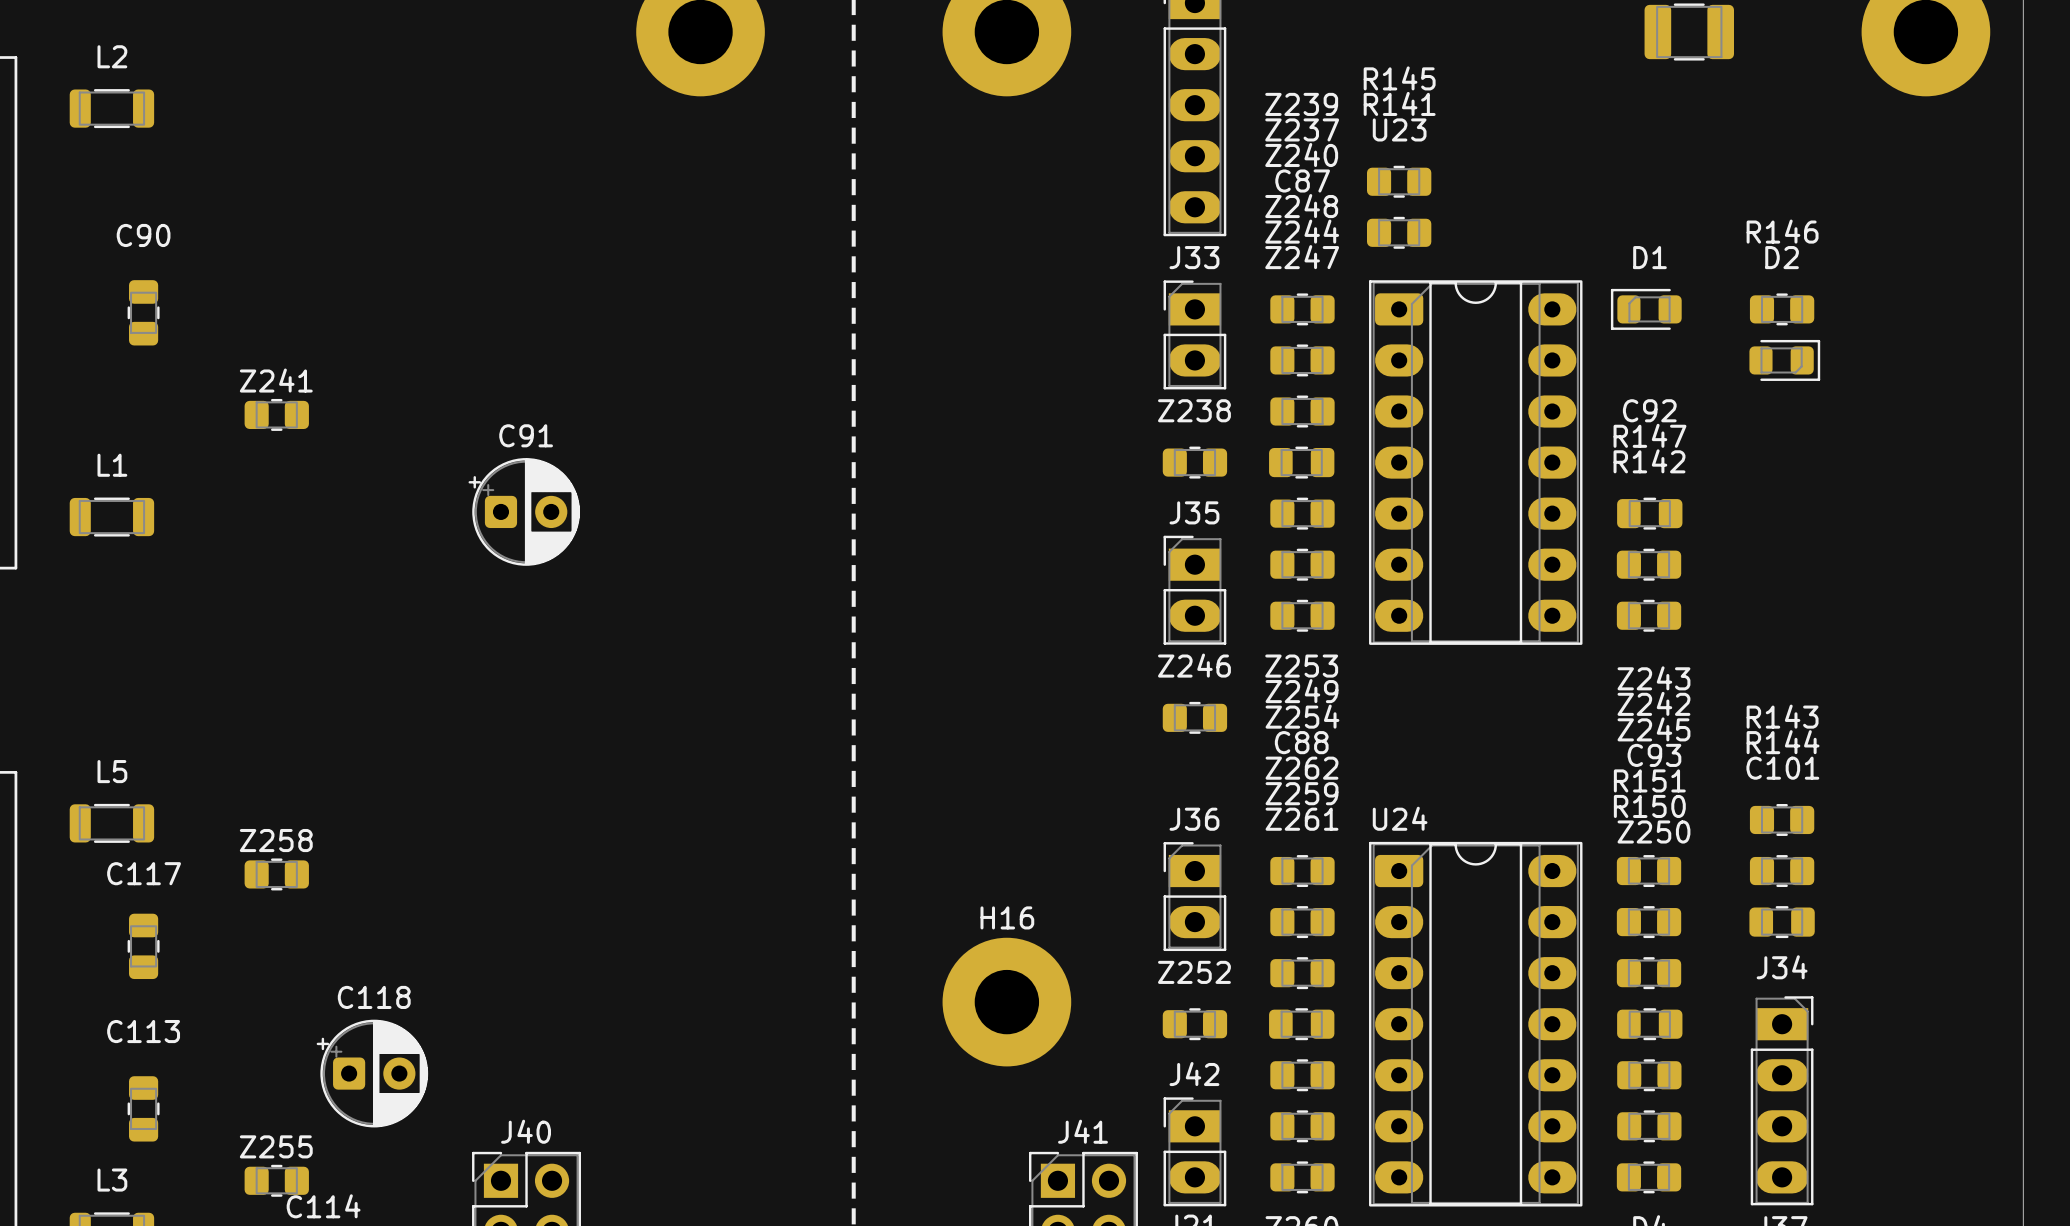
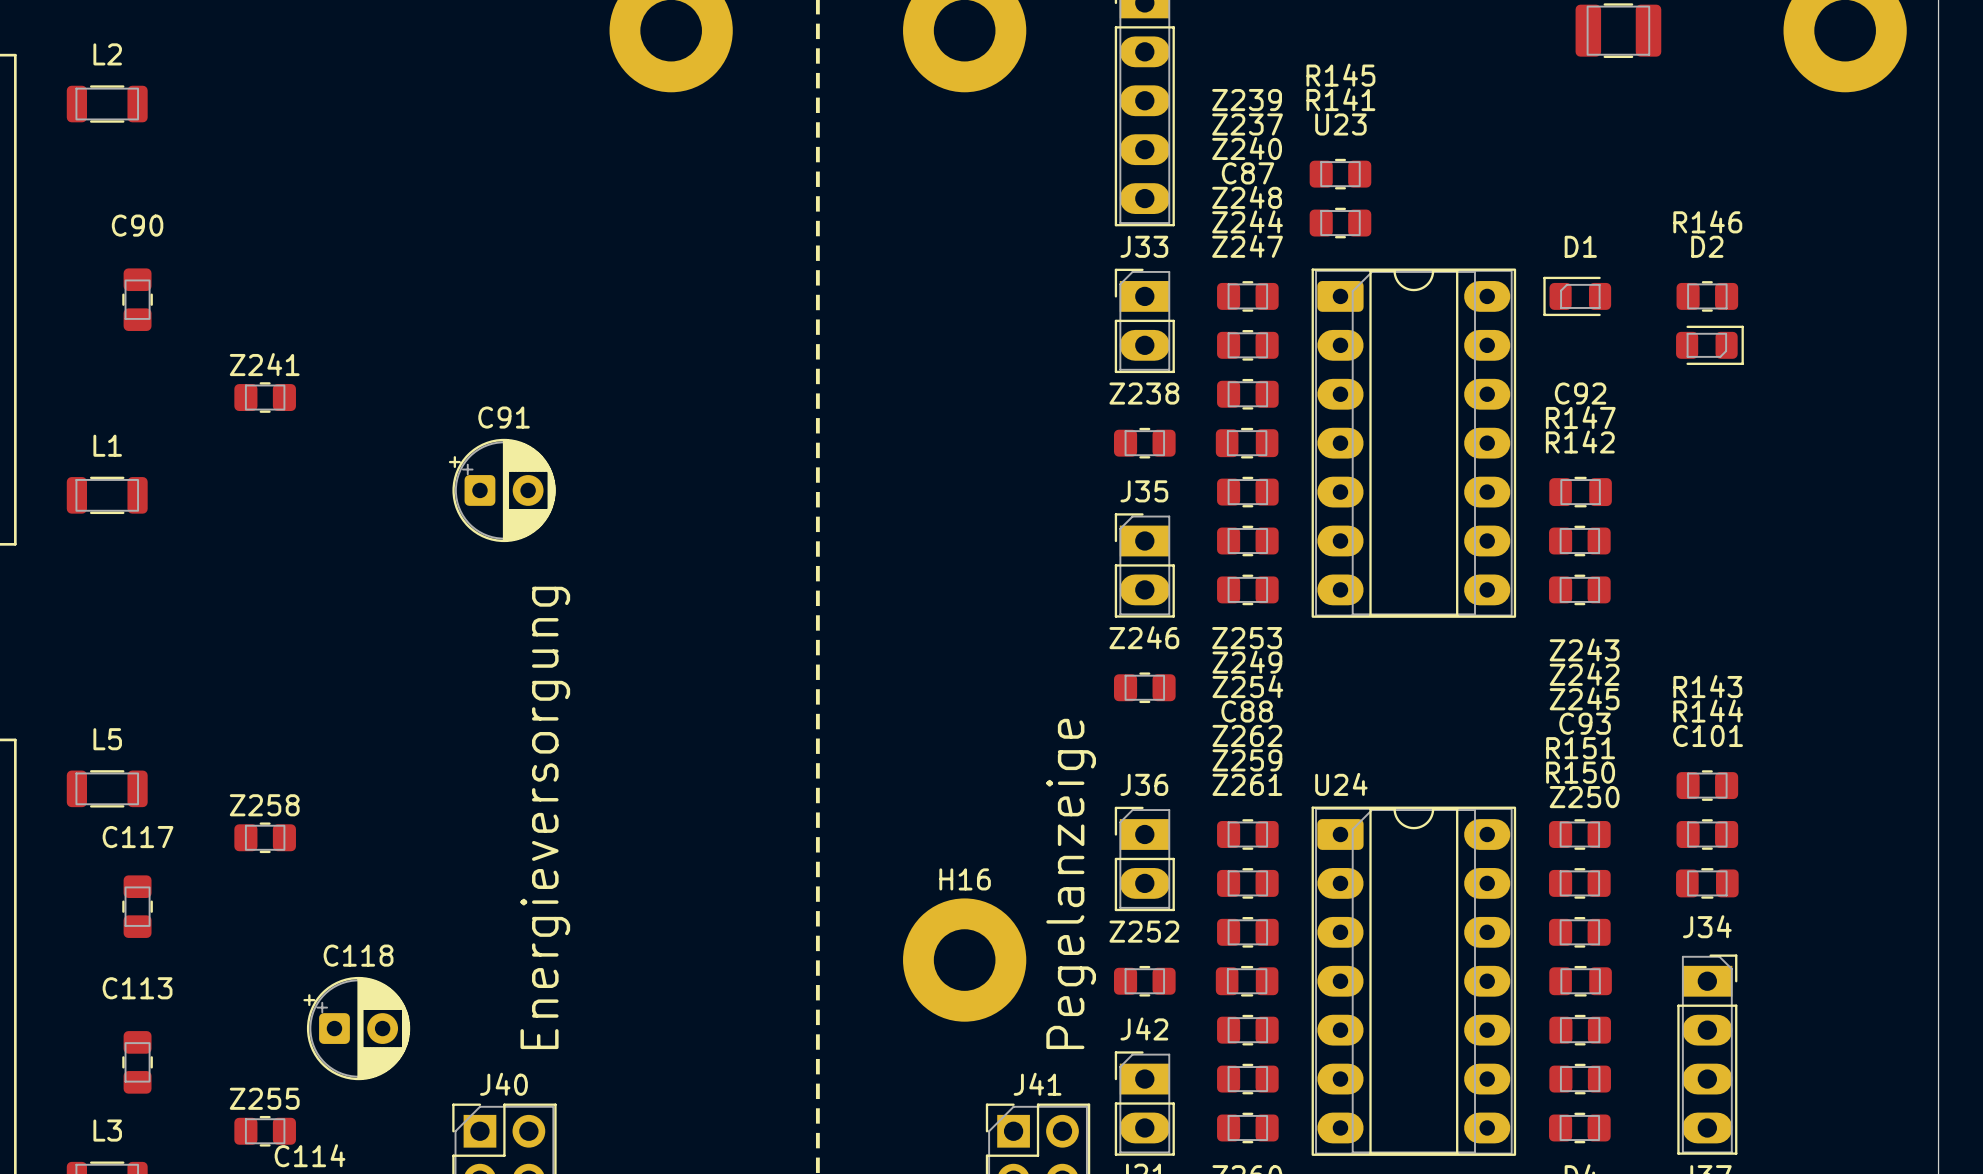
text: none -> Energieversorgung (545, 817)
text: none -> Pegelanzeige (1071, 883)

